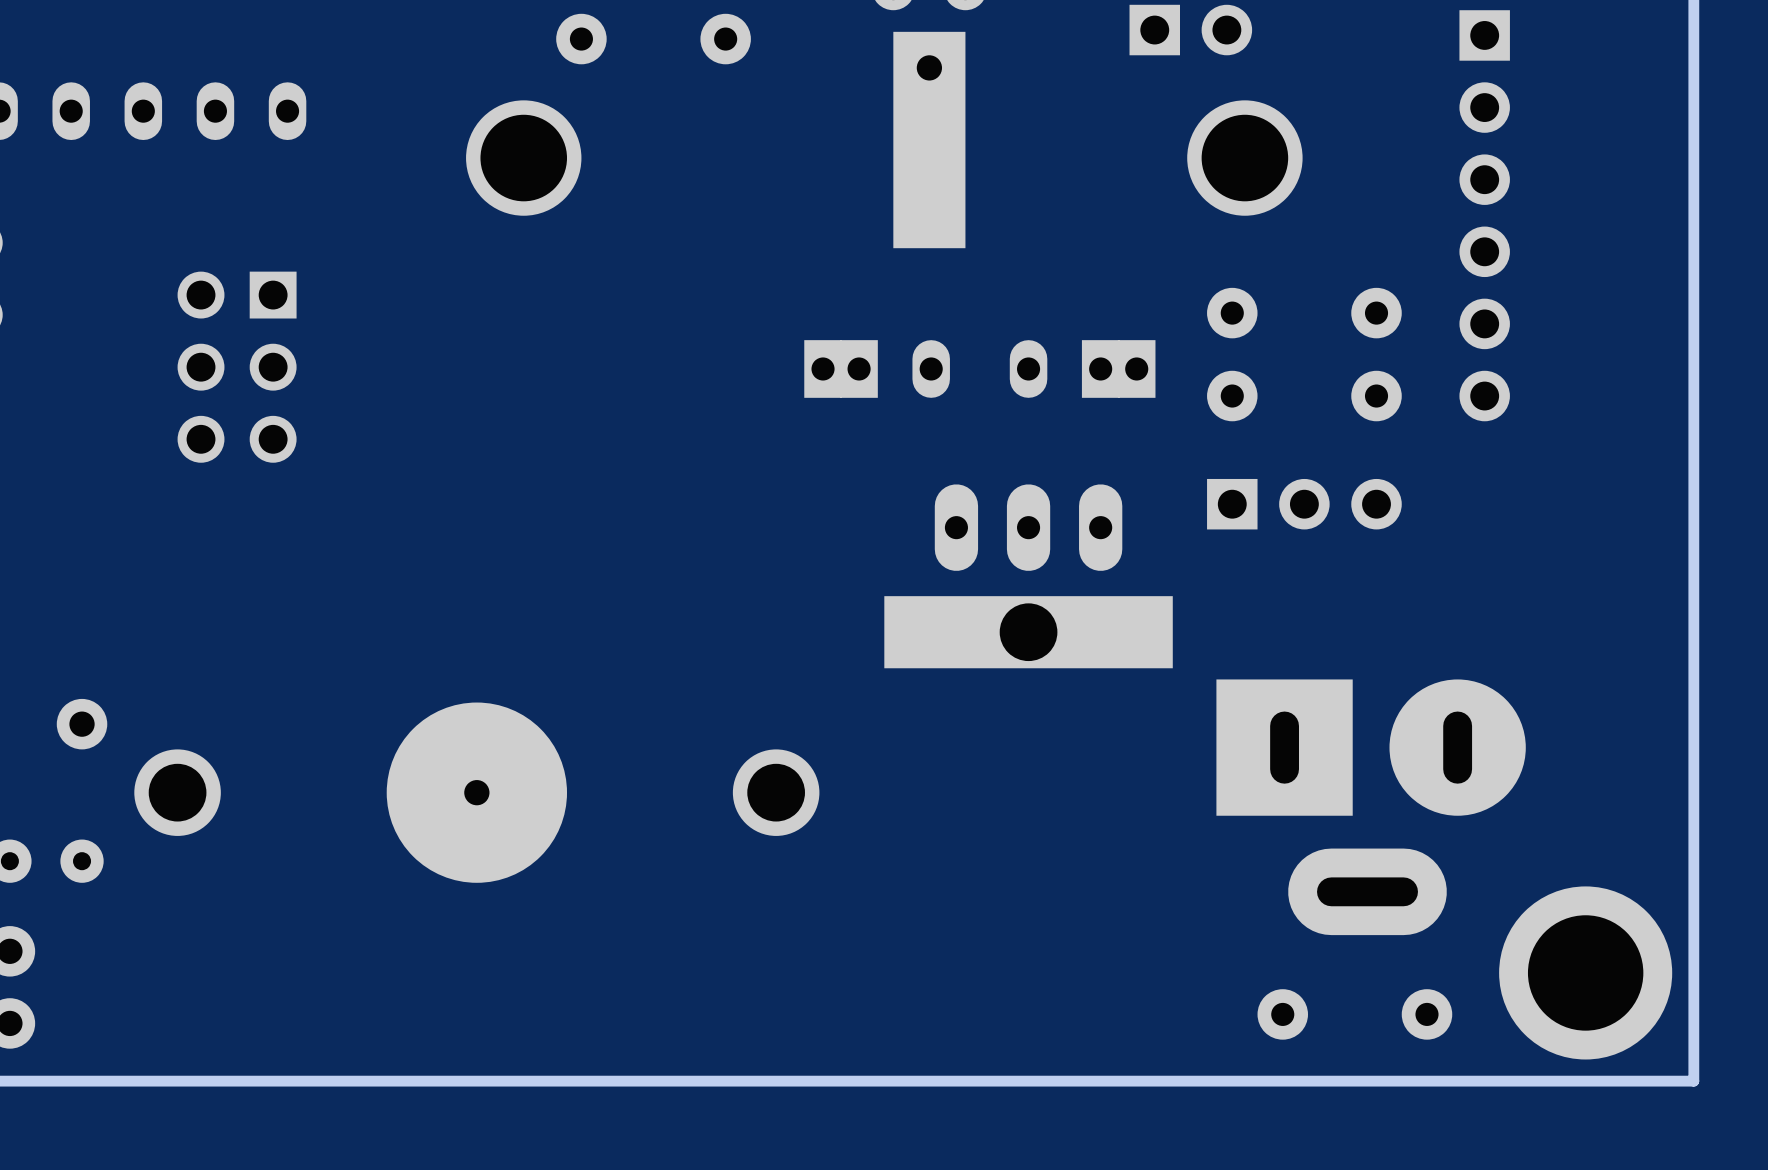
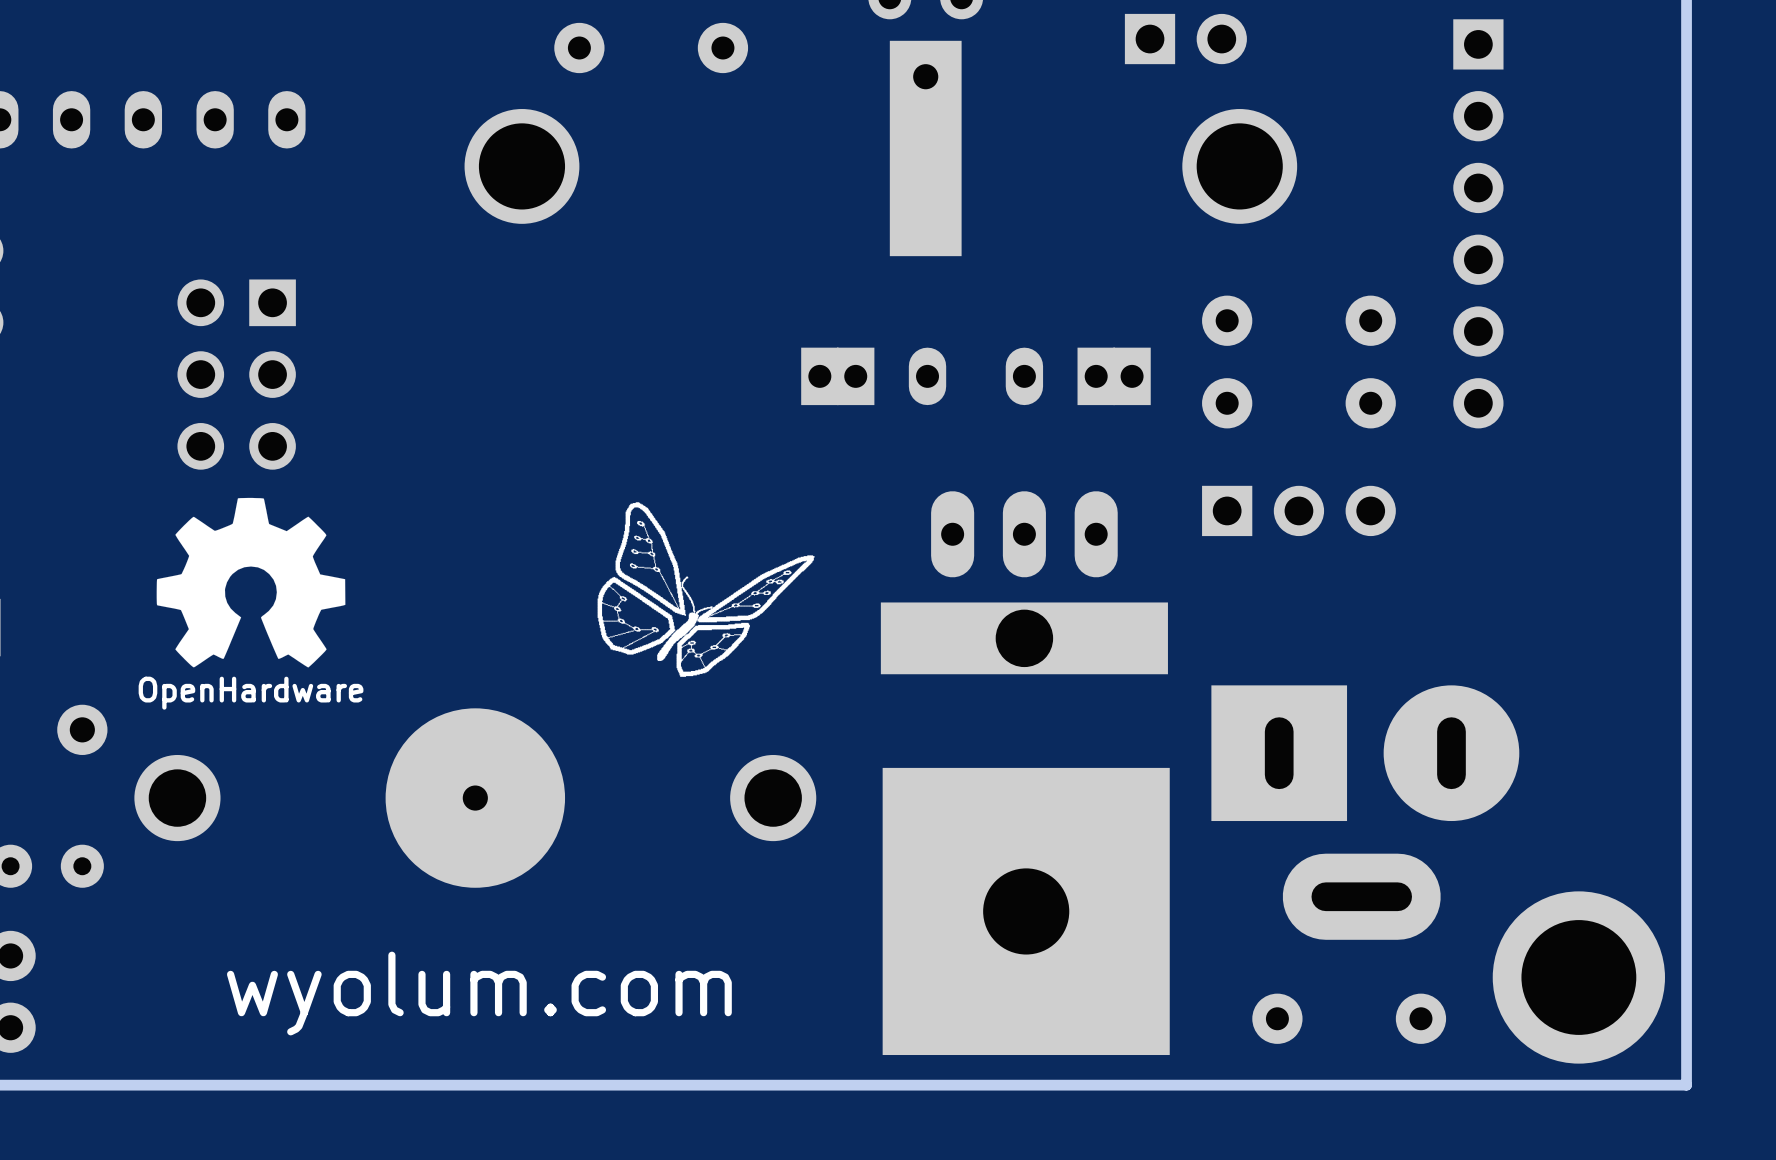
drawing: none -> [156, 497, 346, 668]
drawing: none -> [597, 502, 815, 677]
text: none -> OpenHardware (251, 693)
part: none -> (1026, 911)
text: none -> wyolum.com (479, 993)

